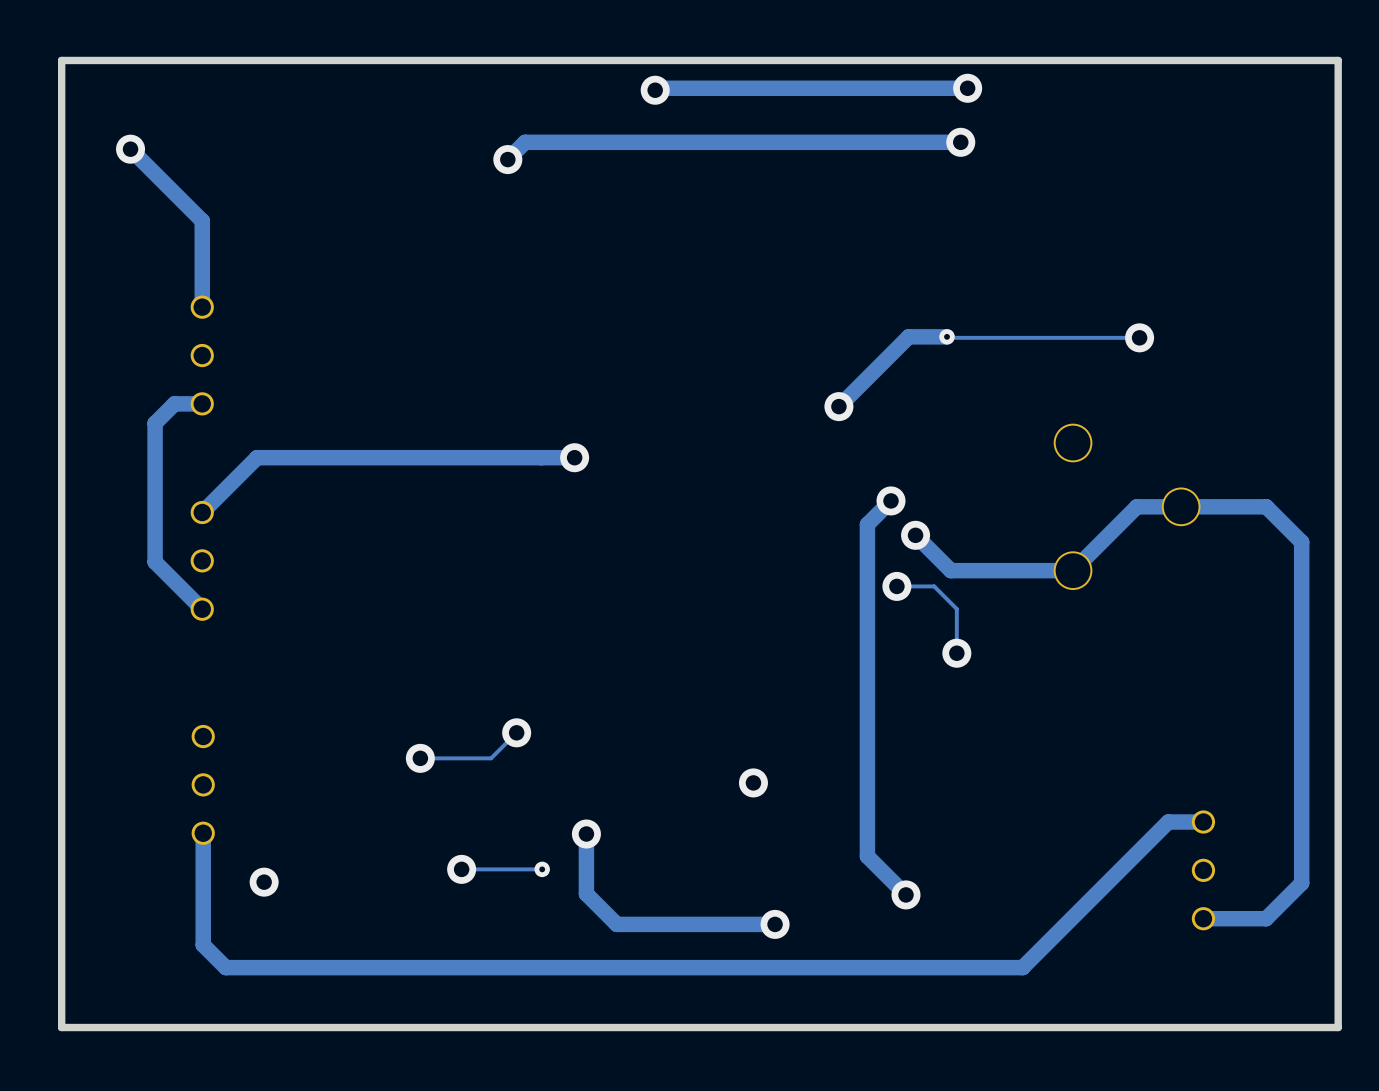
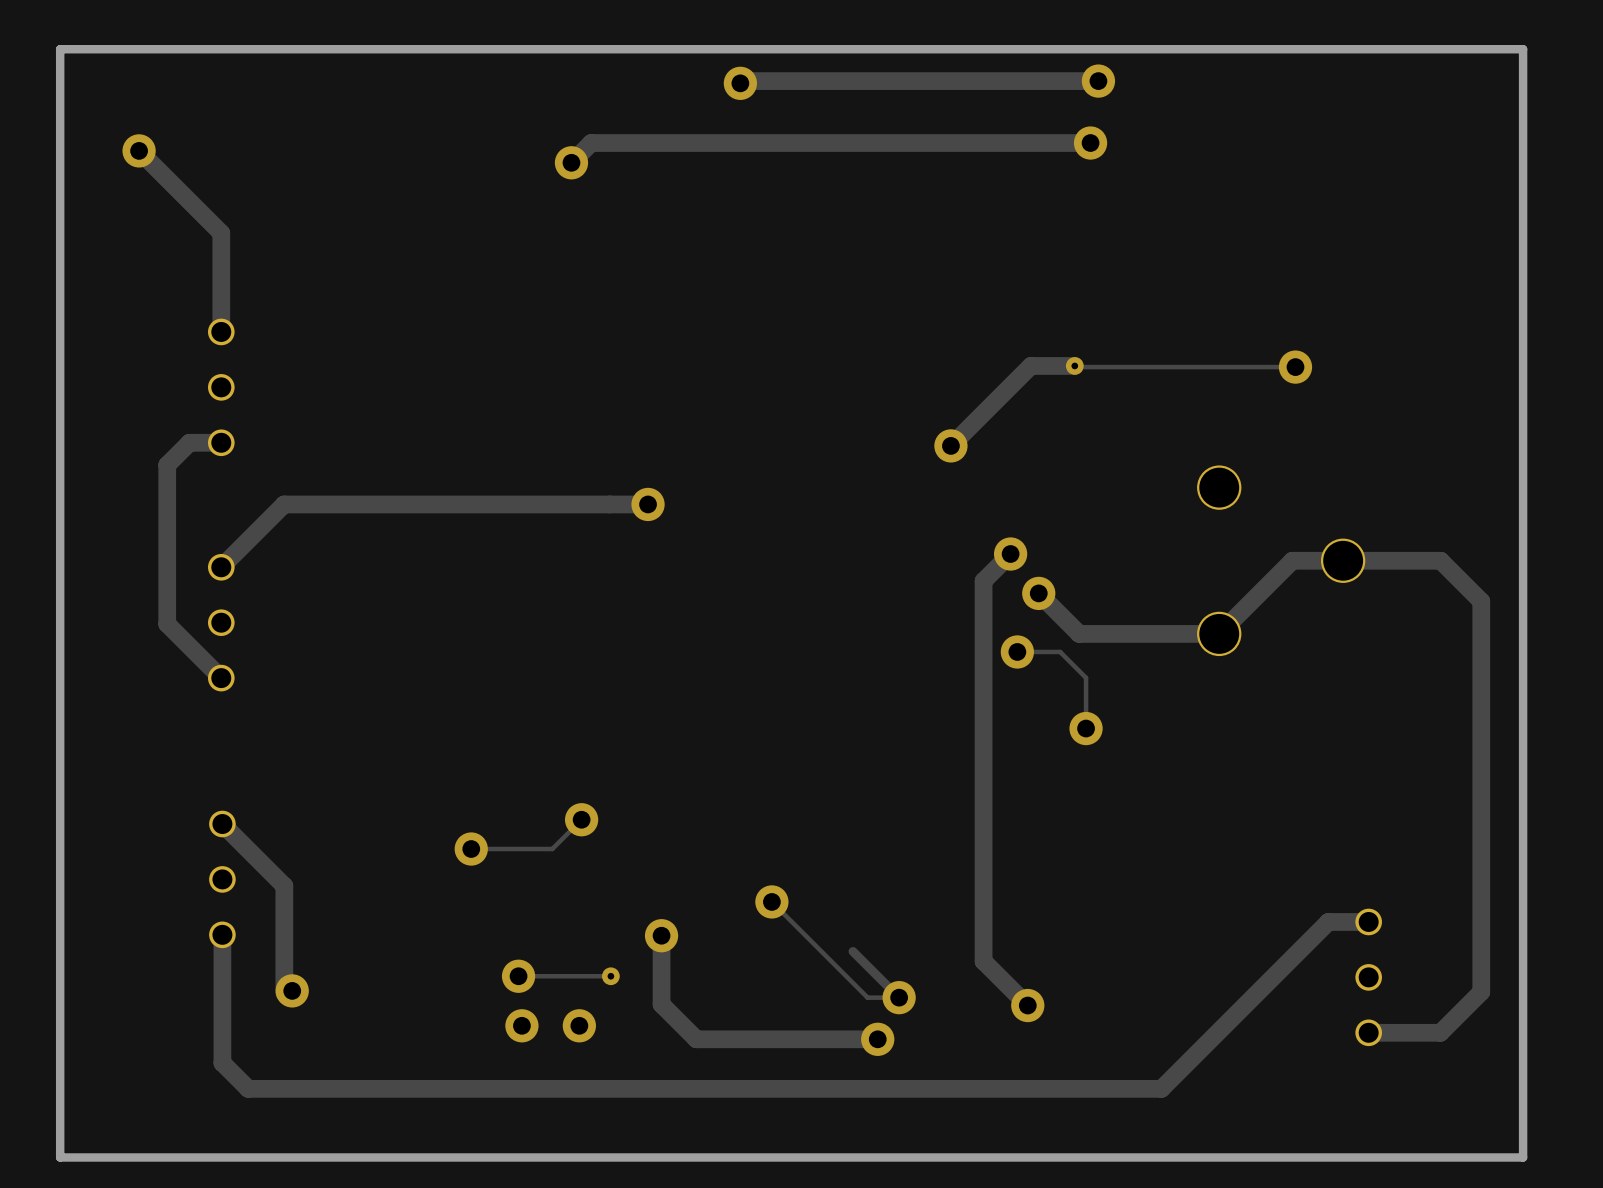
track: none -> (222, 824) (284, 885) (284, 993)
via: (753, 782) -> none
track: none -> (771, 901) (867, 997) (899, 997) (852, 951)
via: none -> (771, 901)
via: none -> (899, 997)
via: none -> (521, 1025)
via: none -> (579, 1025)

